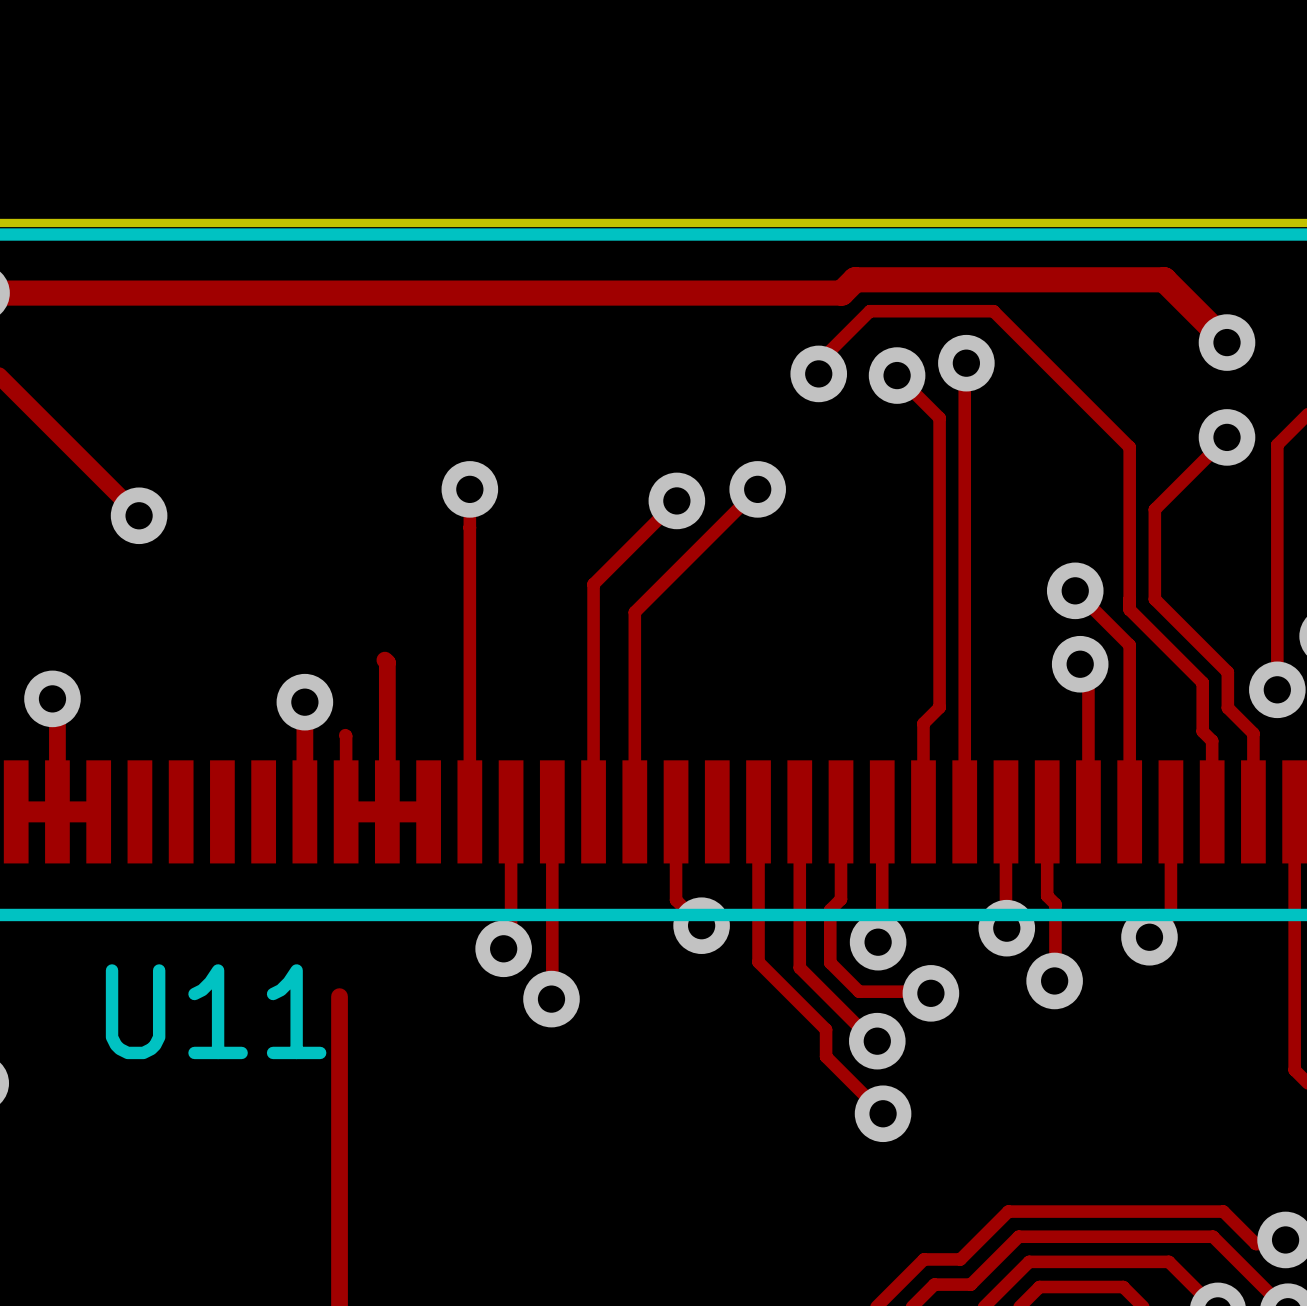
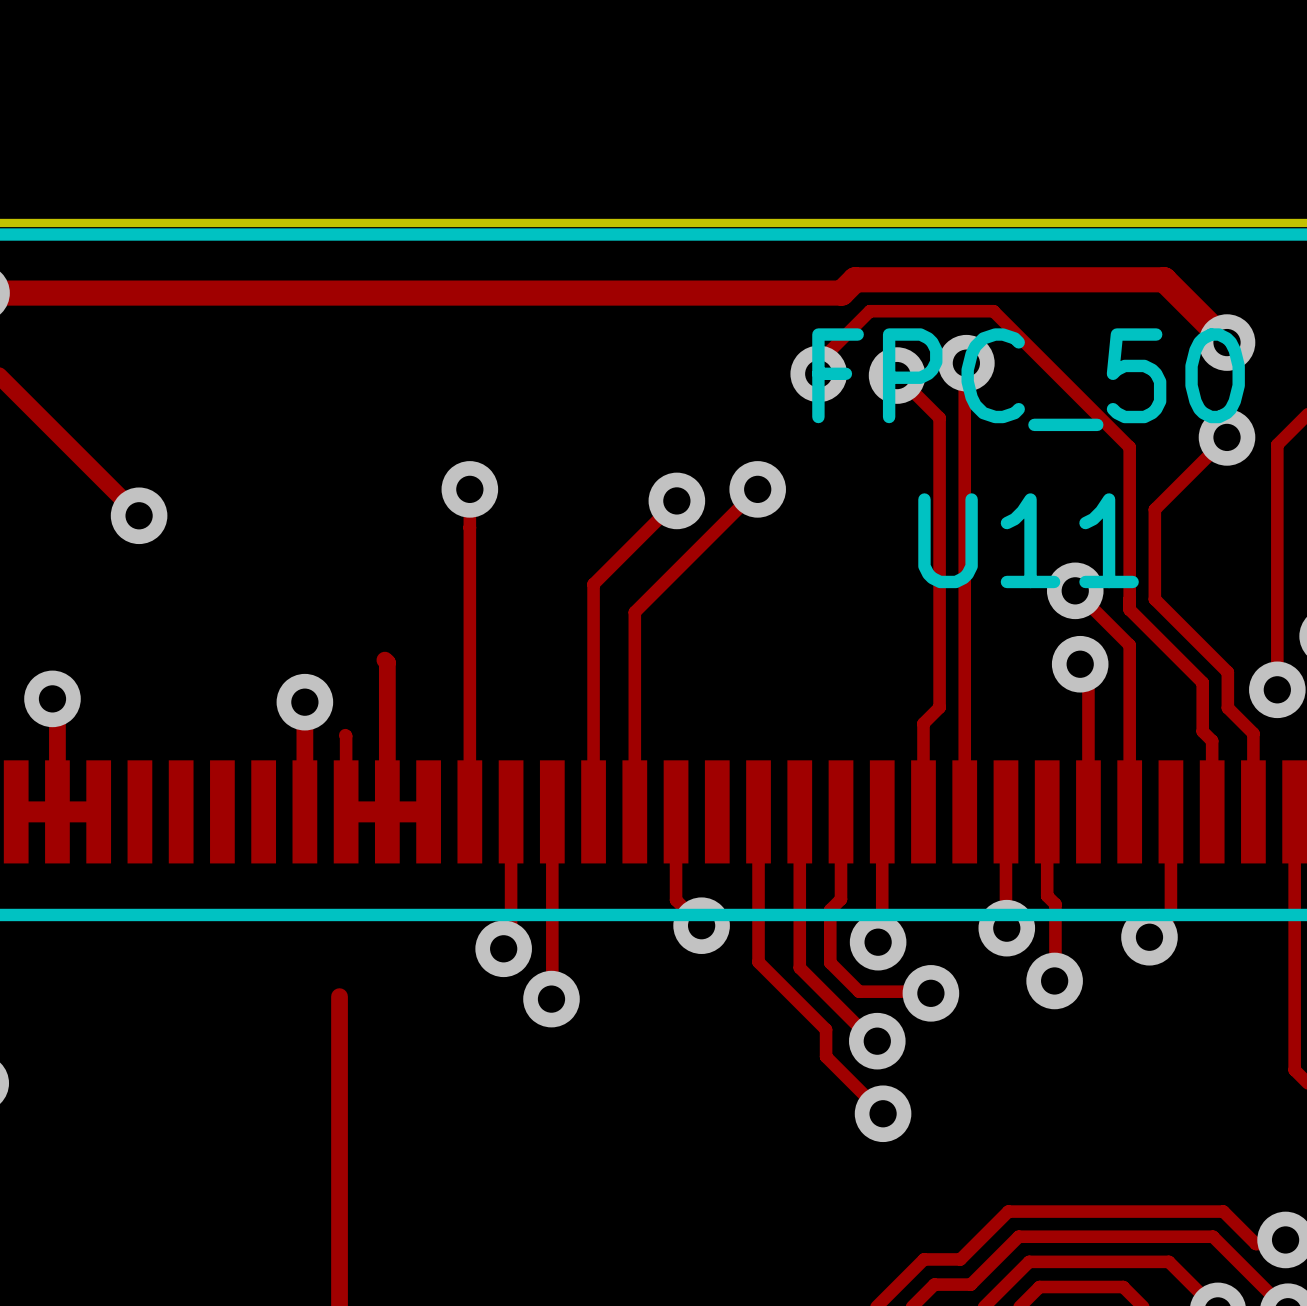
U11 value: none -> FPC_50 (1028, 379)
U11 name position: U11 (216, 1011) -> U11 (1028, 540)

